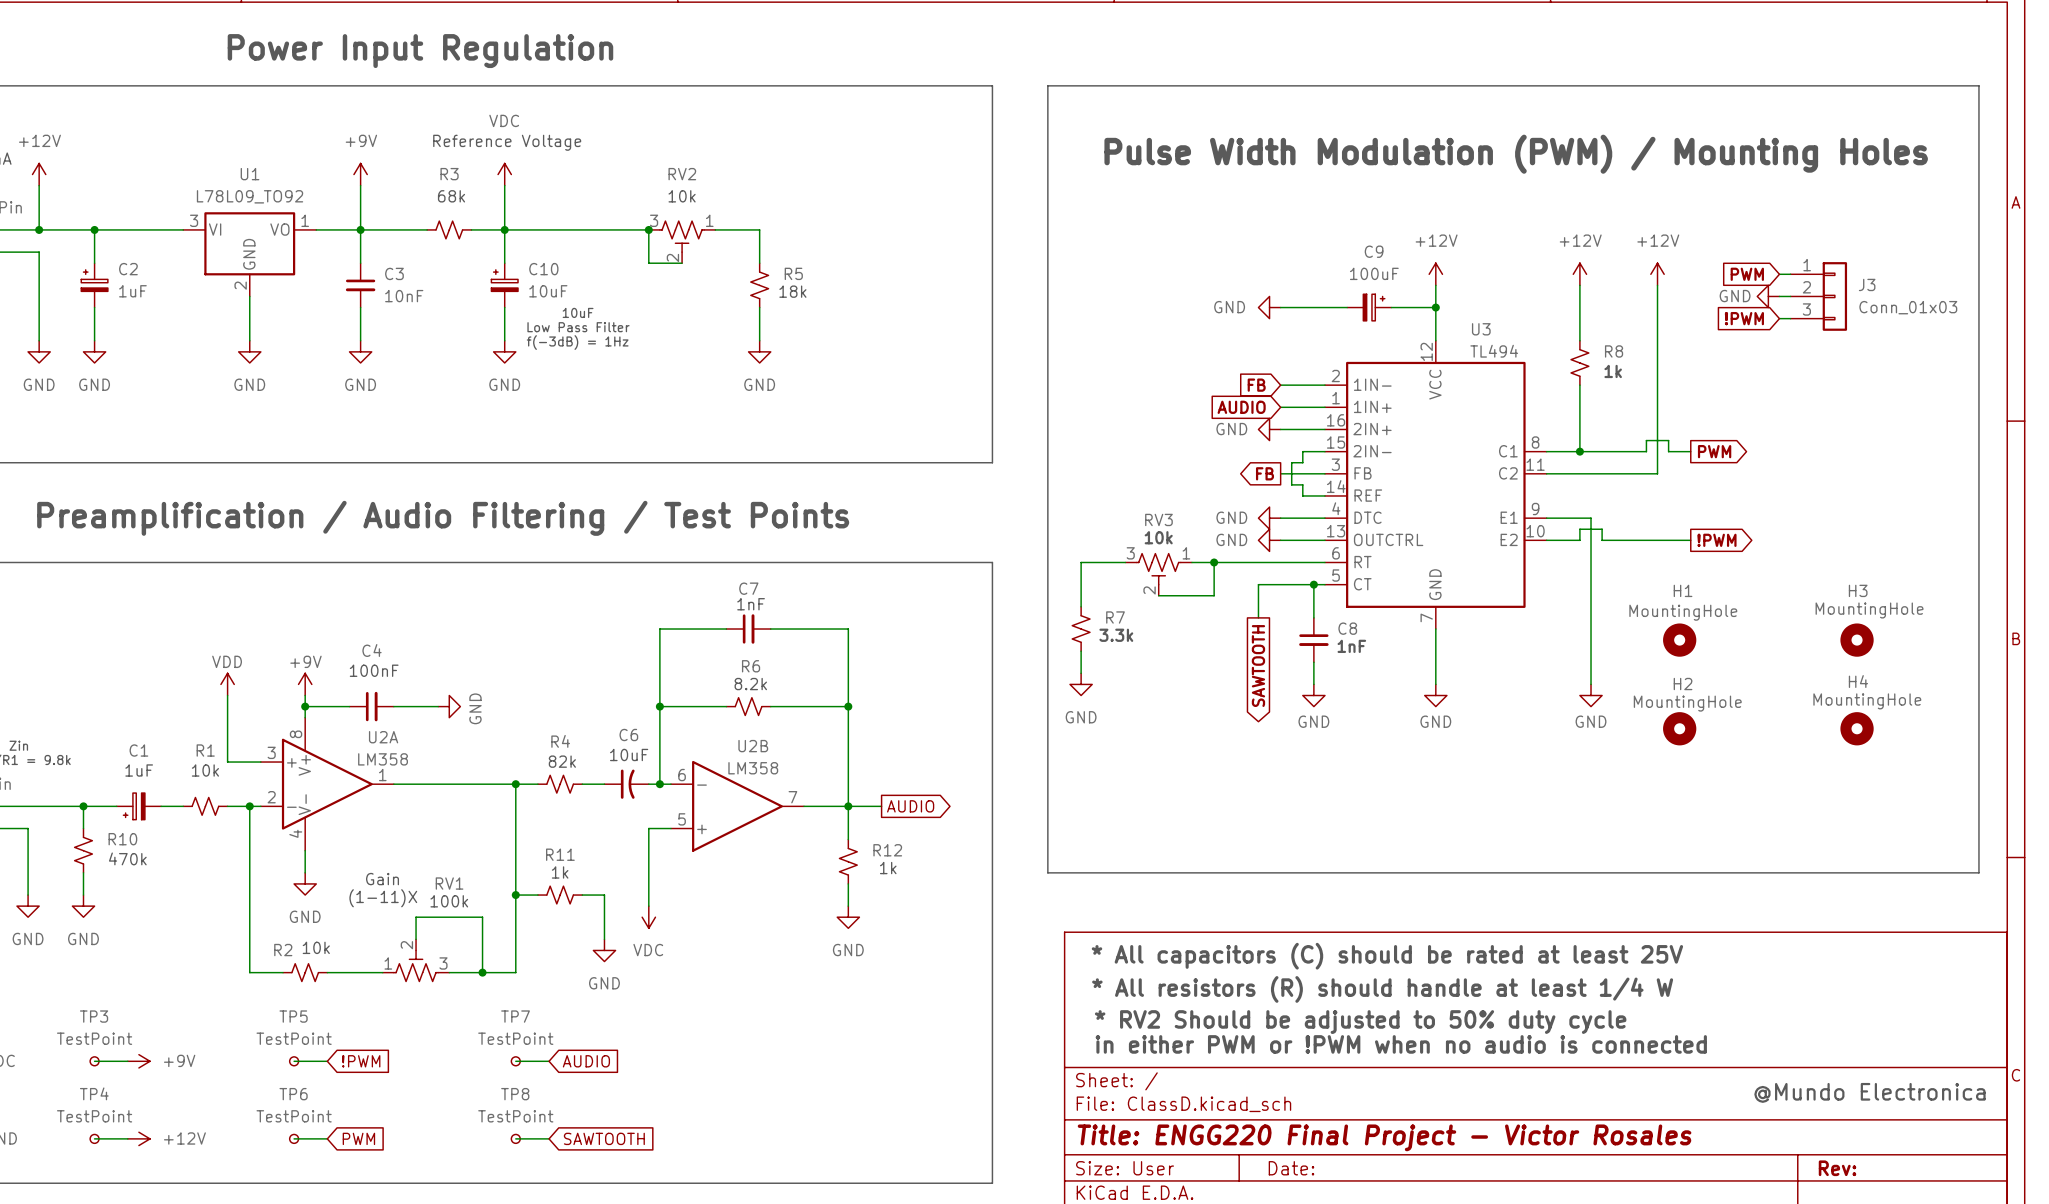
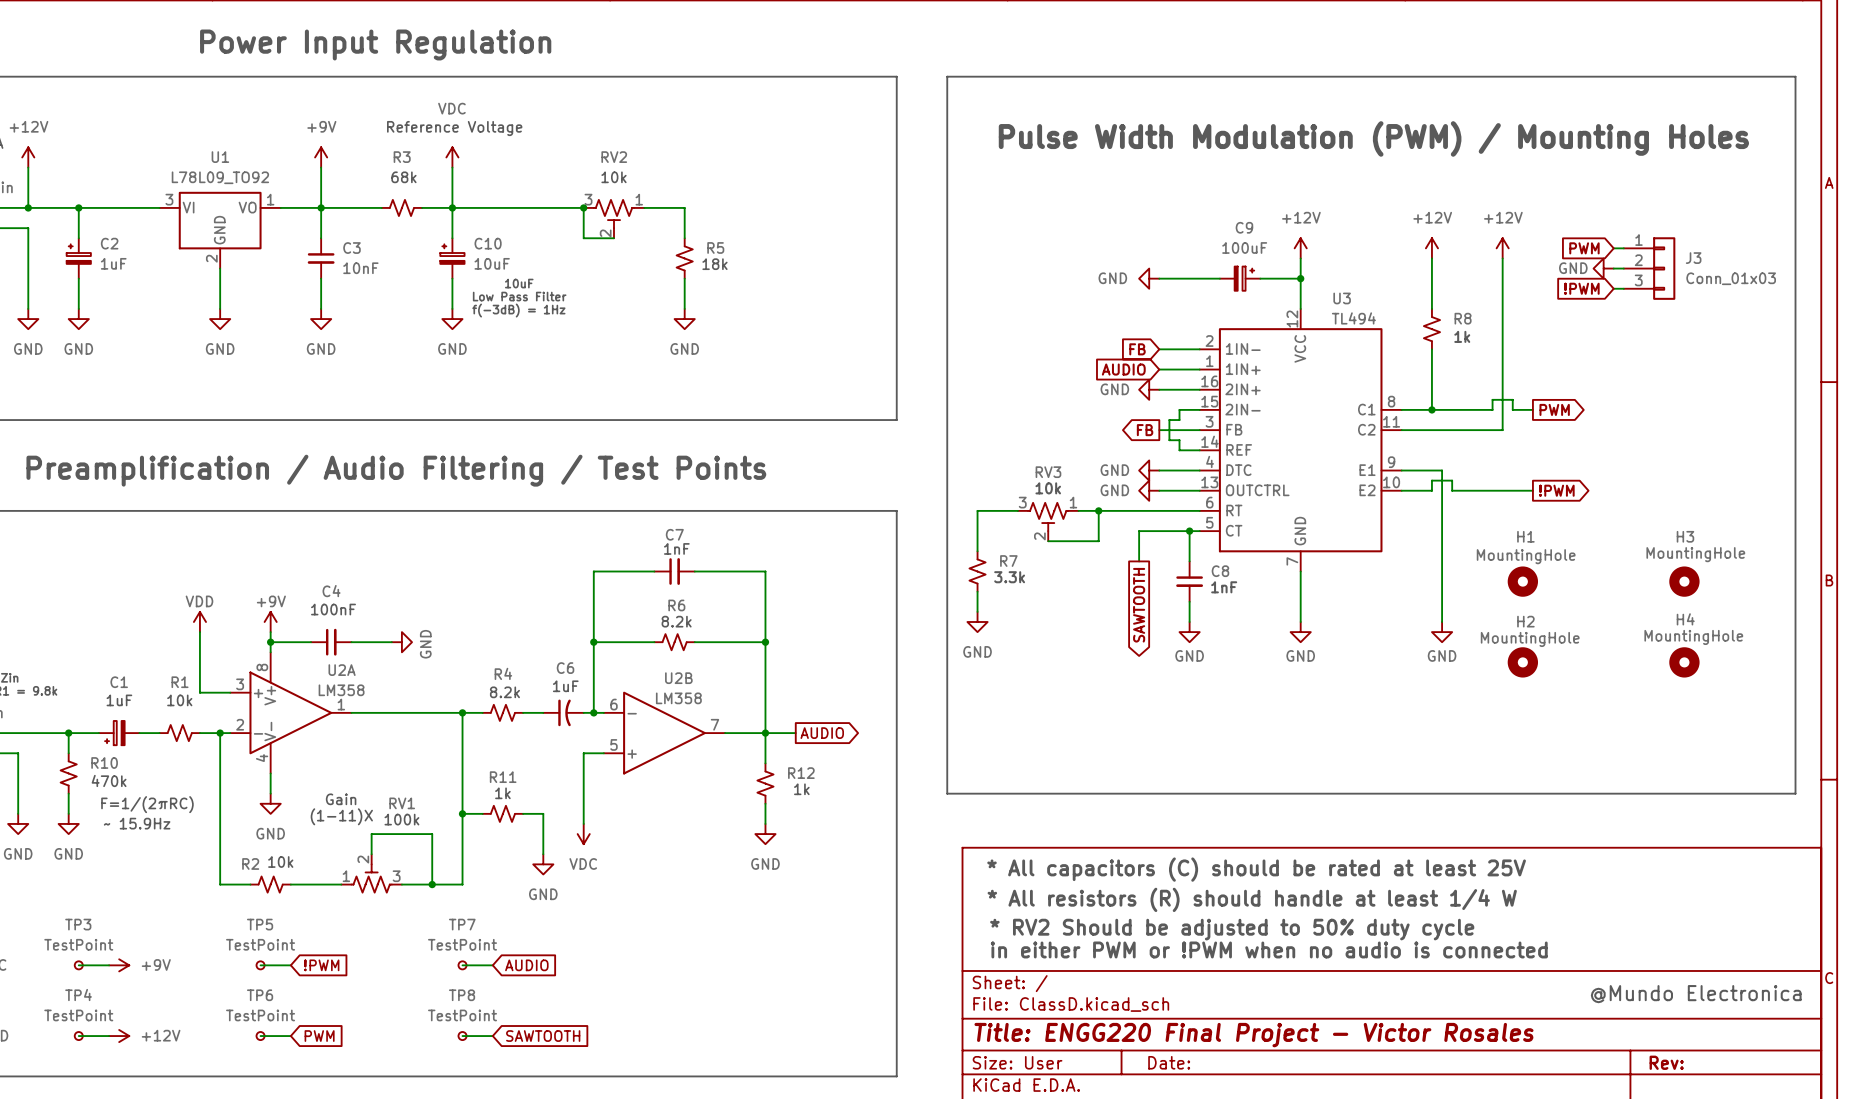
text: 10uF (629, 754) -> 1uF (565, 686)
text: 82k (562, 761) -> 8.2k (504, 692)
text: none -> F=1/(2πRC) (147, 804)
text: none -> ~ 15.9Hz (137, 823)

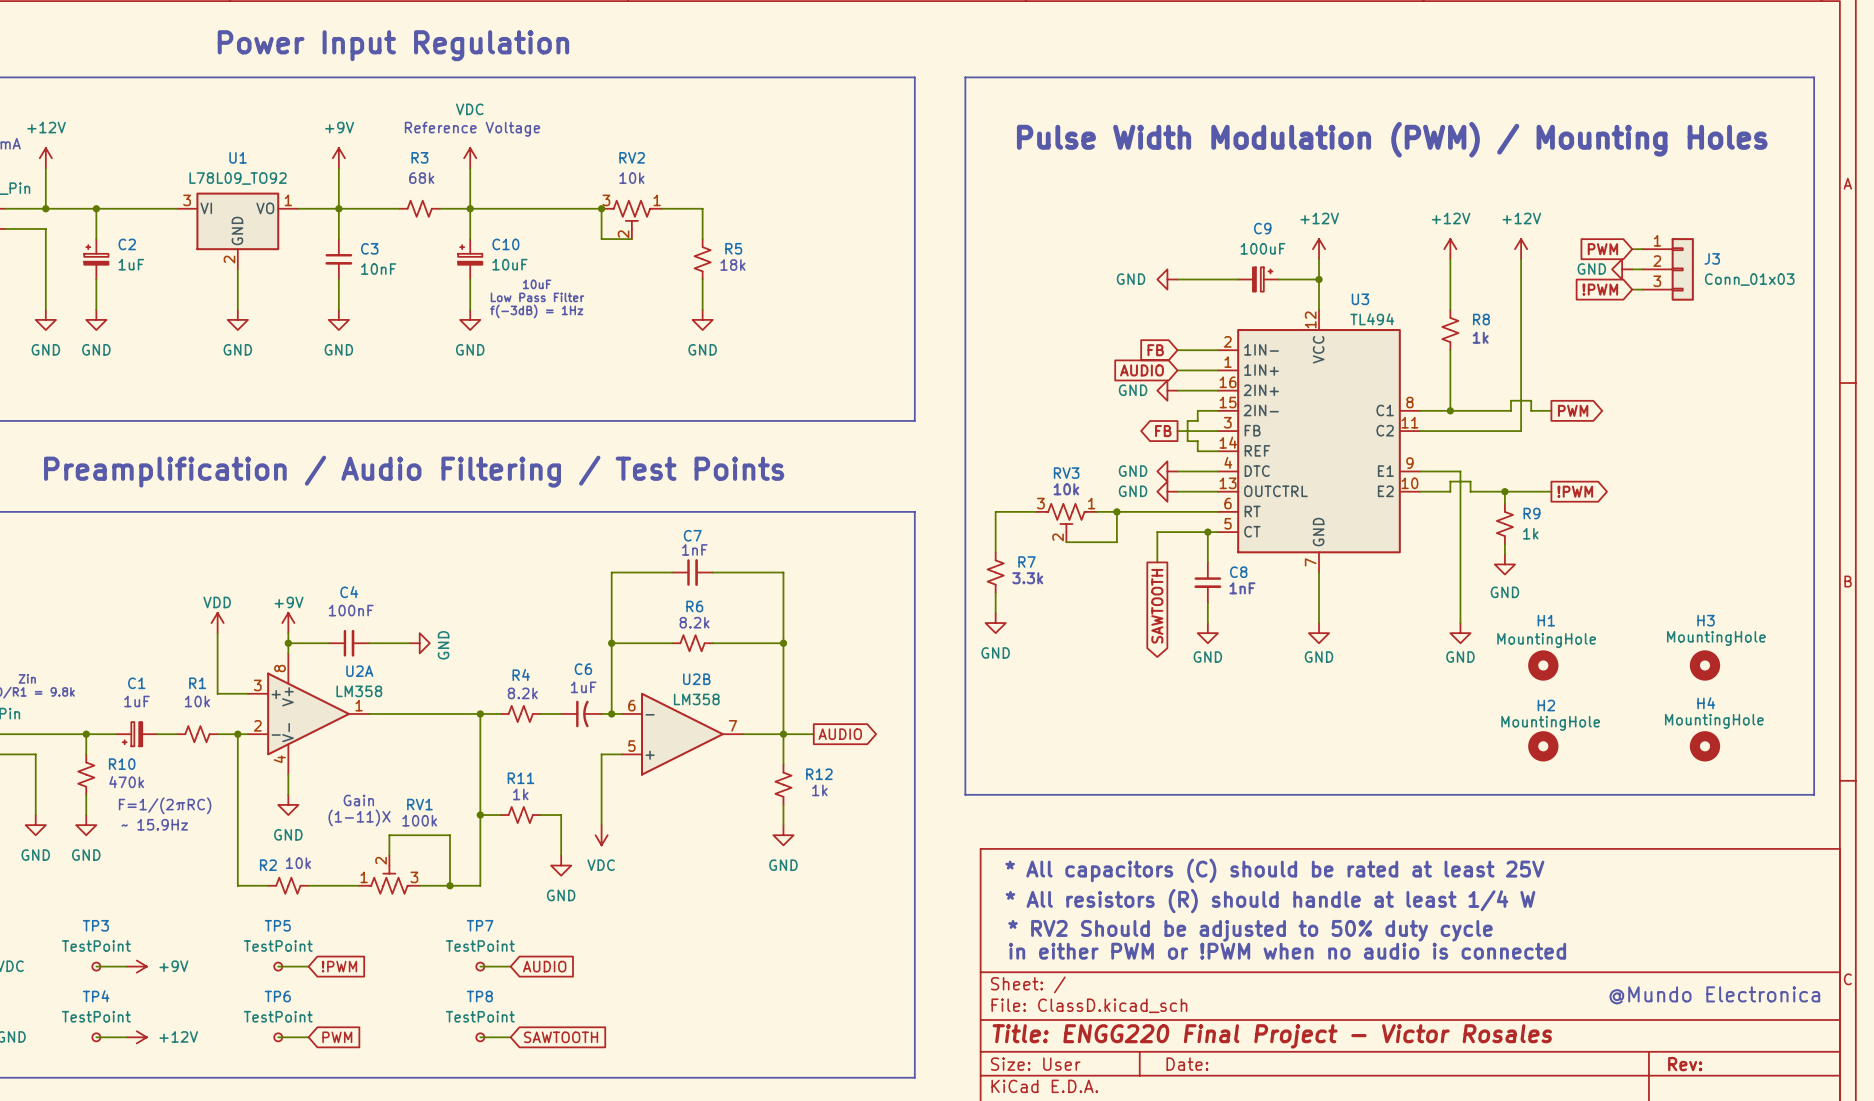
wire: none -> (1504, 491) (1504, 503)
junction: none -> (1504, 491)
R9: none -> 1k (1504, 524)
wire: none -> (1504, 544) (1504, 554)
power symbol: none -> GND (1504, 564)
H1 position: (1522, 581) -> (1543, 665)
H3 position: (1684, 581) -> (1704, 665)
H2 position: (1522, 662) -> (1543, 746)
H4 position: (1684, 662) -> (1704, 746)

